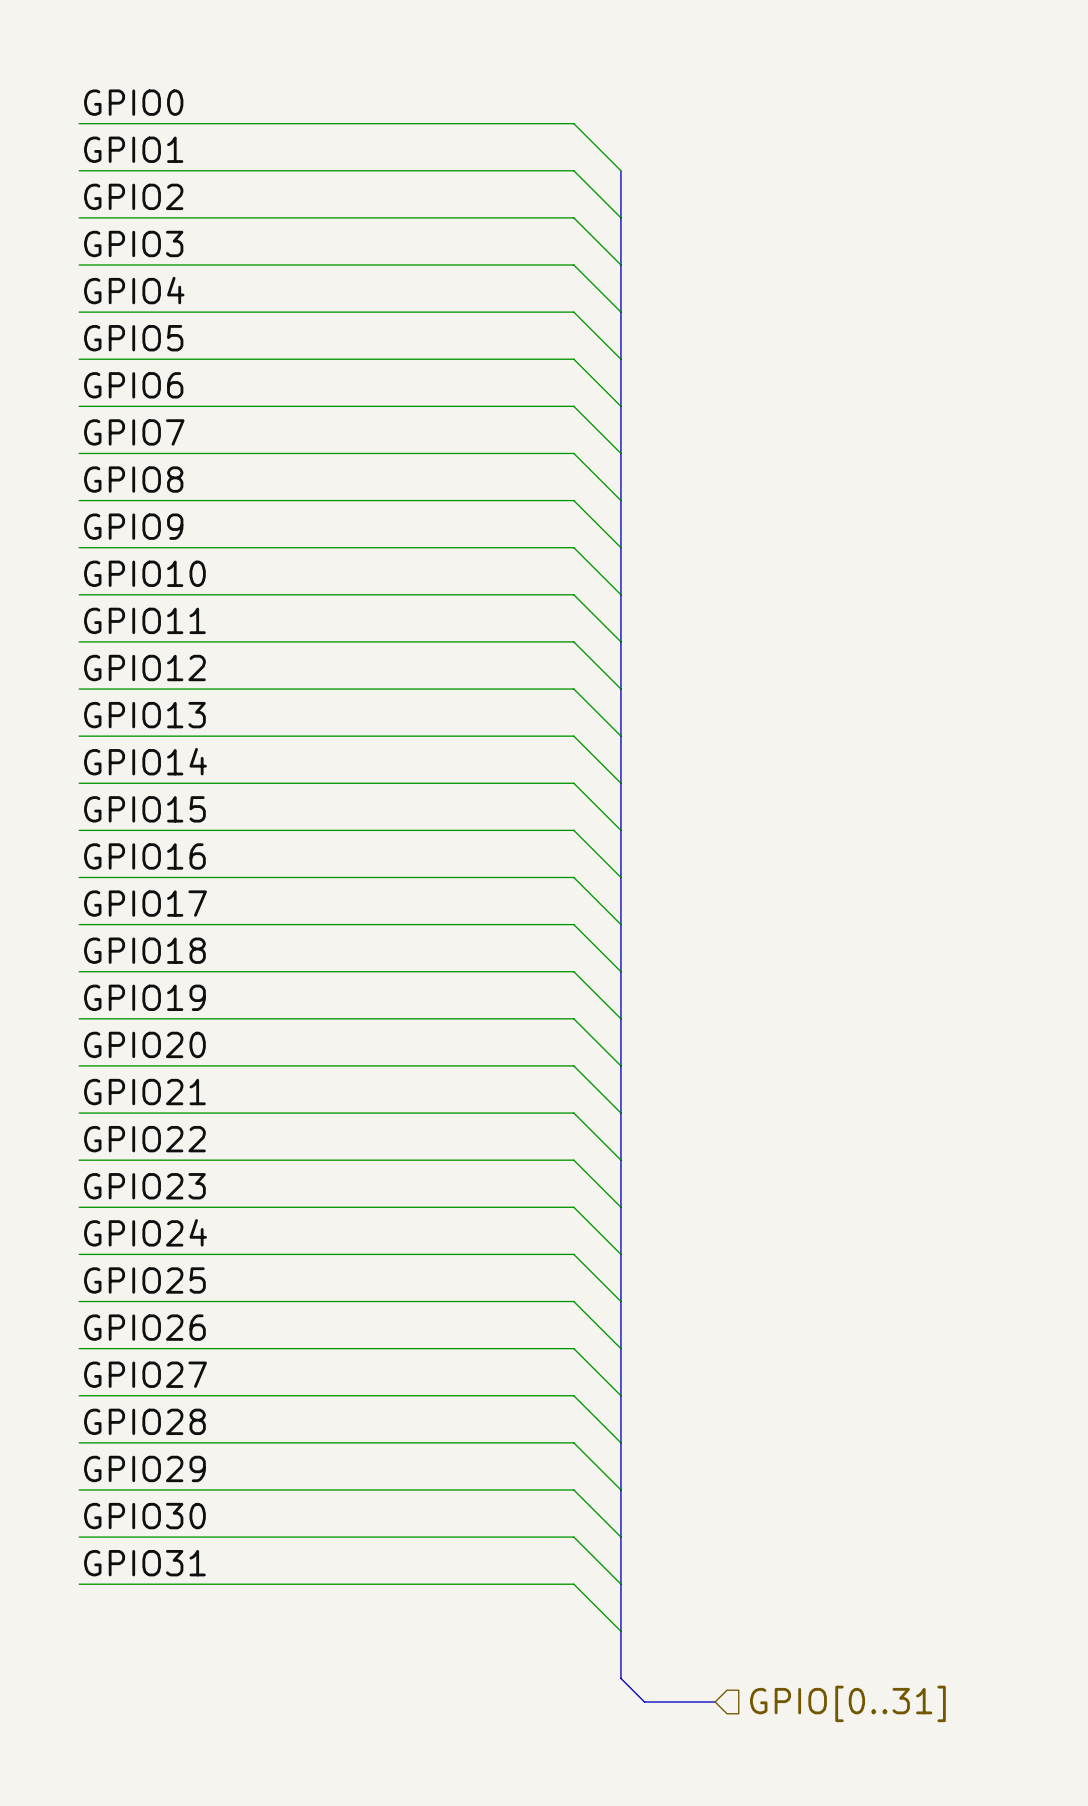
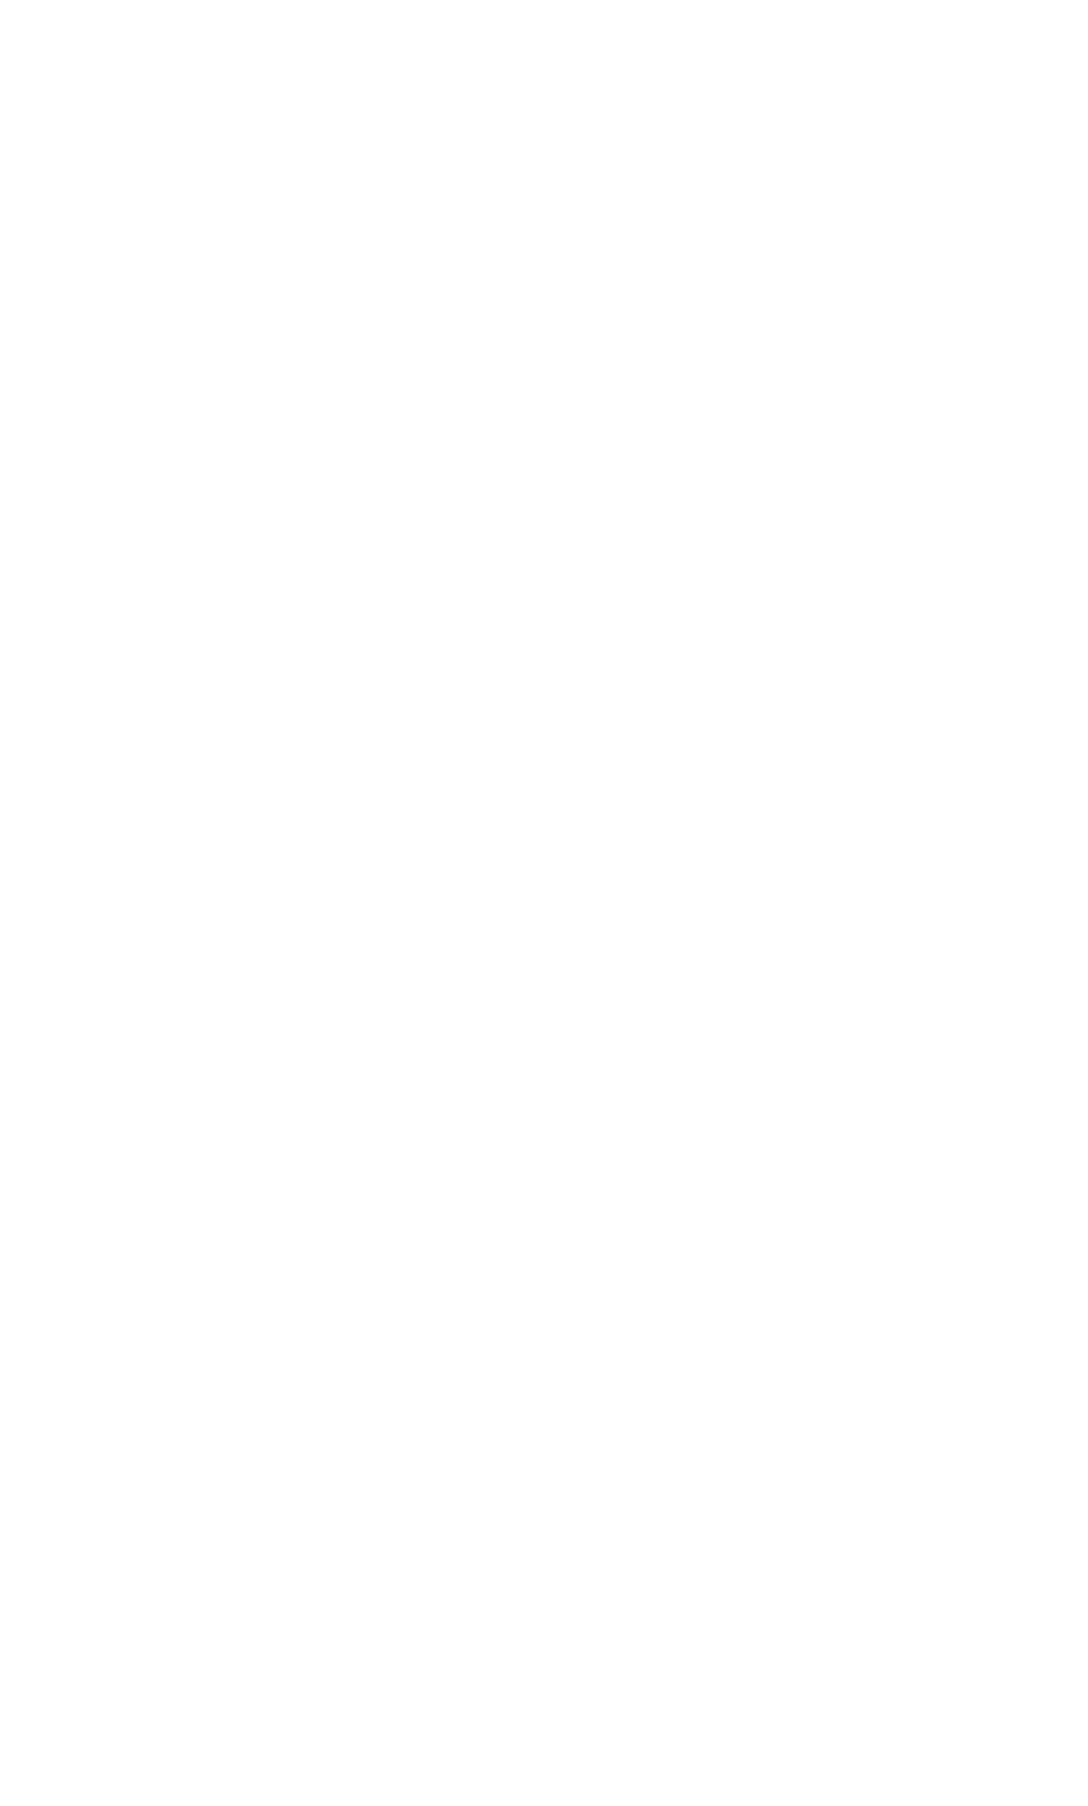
label: GPIO0 (133, 102) -> none
wire: (79, 123) (573, 123) (620, 170) -> none
label: GPIO1 (133, 149) -> none
wire: (79, 170) (573, 170) (620, 217) -> none
bus: (620, 170) (620, 1678) (644, 1701) (715, 1701) -> none
label: GPIO2 (133, 196) -> none
wire: (79, 217) (573, 217) (620, 265) -> none
label: GPIO3 (133, 243) -> none
wire: (79, 265) (573, 265) (620, 312) -> none
label: GPIO4 (134, 290) -> none
wire: (79, 312) (573, 312) (620, 359) -> none
label: GPIO5 (133, 338) -> none
wire: (79, 359) (573, 359) (620, 406) -> none
label: GPIO6 (133, 385) -> none
wire: (79, 406) (573, 406) (620, 453) -> none
label: GPIO7 (134, 432) -> none
wire: (79, 453) (573, 453) (620, 500) -> none
label: GPIO8 (133, 479) -> none
wire: (79, 500) (573, 500) (620, 547) -> none
label: GPIO9 (133, 526) -> none
wire: (79, 547) (573, 547) (620, 594) -> none
label: GPIO10 (144, 573) -> none
wire: (79, 594) (573, 594) (620, 641) -> none
label: GPIO11 (144, 620) -> none
wire: (79, 641) (573, 641) (620, 689) -> none
label: GPIO12 (144, 668) -> none
wire: (79, 689) (573, 689) (620, 736) -> none
label: GPIO13 (144, 715) -> none
wire: (79, 736) (573, 736) (620, 783) -> none
label: GPIO14 (145, 761) -> none
wire: (79, 783) (573, 783) (620, 830) -> none
label: GPIO15 (144, 809) -> none
wire: (79, 830) (573, 830) (620, 877) -> none
label: GPIO16 (144, 856) -> none
wire: (79, 877) (573, 877) (620, 924) -> none
label: GPIO17 (145, 903) -> none
wire: (79, 924) (573, 924) (620, 971) -> none
label: GPIO18 (144, 950) -> none
wire: (79, 971) (573, 971) (620, 1018) -> none
label: GPIO19 (144, 997) -> none
wire: (79, 1018) (573, 1018) (620, 1065) -> none
label: GPIO20 (144, 1044) -> none
wire: (79, 1065) (573, 1065) (620, 1113) -> none
label: GPIO21 (144, 1092) -> none
wire: (79, 1113) (573, 1113) (620, 1160) -> none
label: GPIO22 (144, 1139) -> none
wire: (79, 1160) (573, 1160) (620, 1207) -> none
label: GPIO23 (144, 1186) -> none
wire: (79, 1207) (573, 1207) (620, 1254) -> none
label: GPIO24 (145, 1232) -> none
wire: (79, 1254) (573, 1254) (620, 1301) -> none
label: GPIO25 (144, 1280) -> none
wire: (79, 1301) (573, 1301) (620, 1348) -> none
label: GPIO26 (144, 1327) -> none
wire: (79, 1348) (573, 1348) (620, 1395) -> none
label: GPIO27 (145, 1374) -> none
wire: (79, 1395) (573, 1395) (620, 1442) -> none
label: GPIO28 (144, 1421) -> none
wire: (79, 1442) (573, 1442) (620, 1489) -> none
label: GPIO29 (144, 1468) -> none
wire: (79, 1489) (573, 1489) (620, 1537) -> none
label: GPIO30 (144, 1516) -> none
wire: (79, 1537) (573, 1537) (620, 1584) -> none
label: GPIO31 (144, 1563) -> none
wire: (79, 1584) (573, 1584) (620, 1631) -> none
hierarchical label: GPIO[0..31] (847, 1703) -> none

